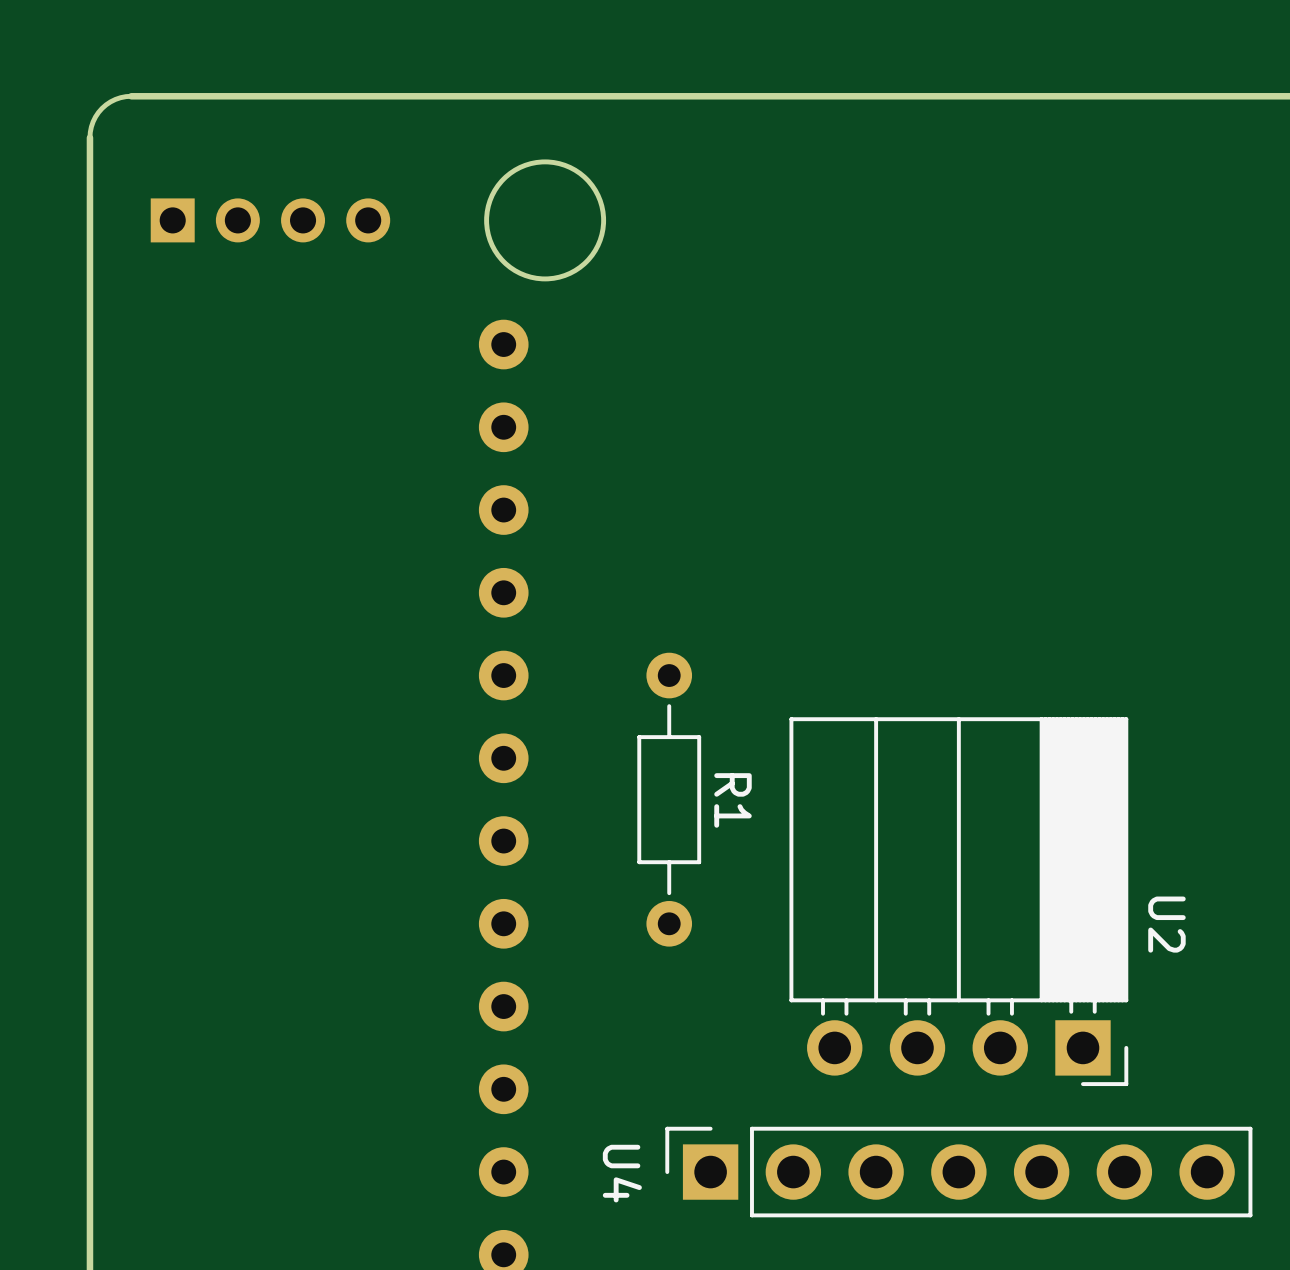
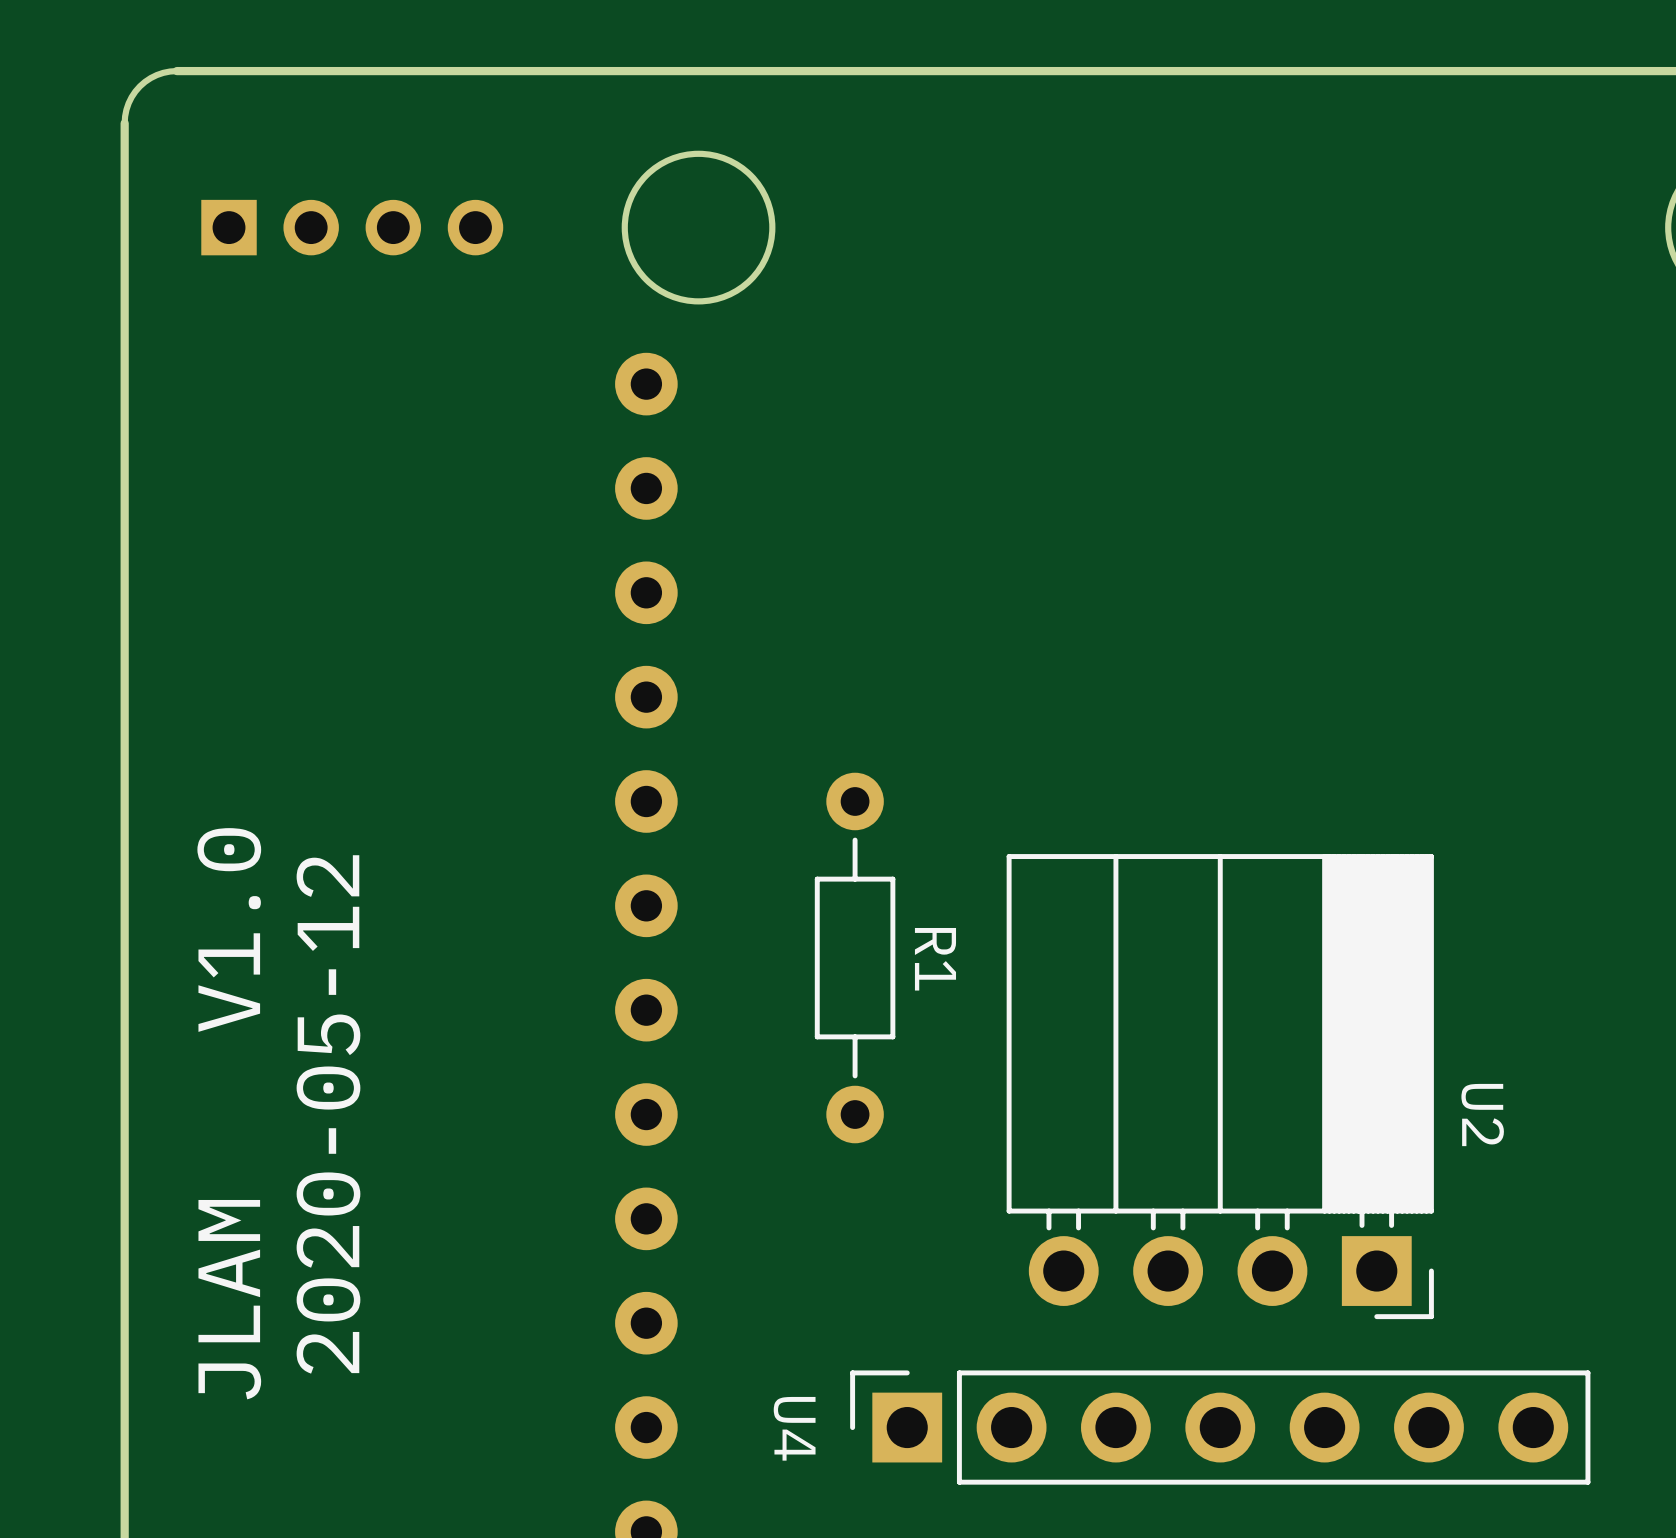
text: none -> JLAM V1.0 (229, 1113)
text: none -> 2020-05-12 (328, 1114)

